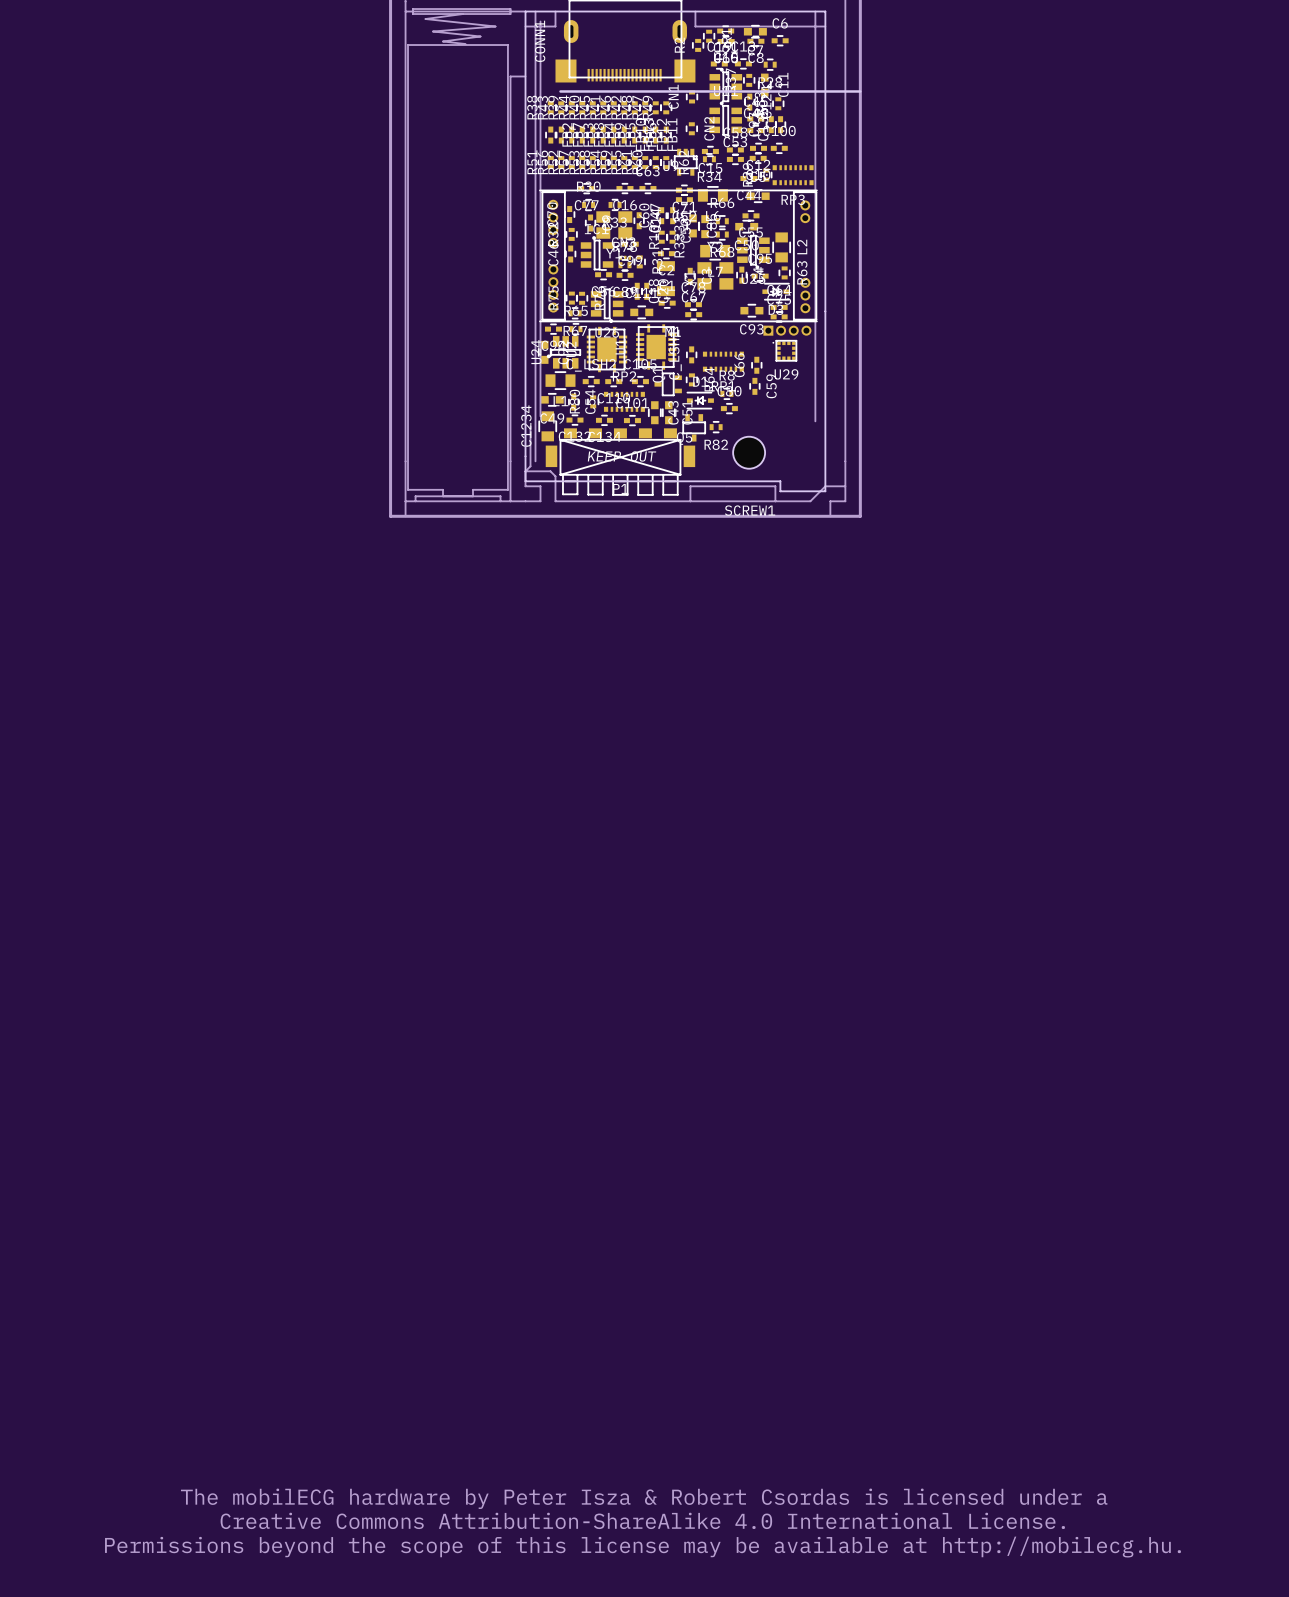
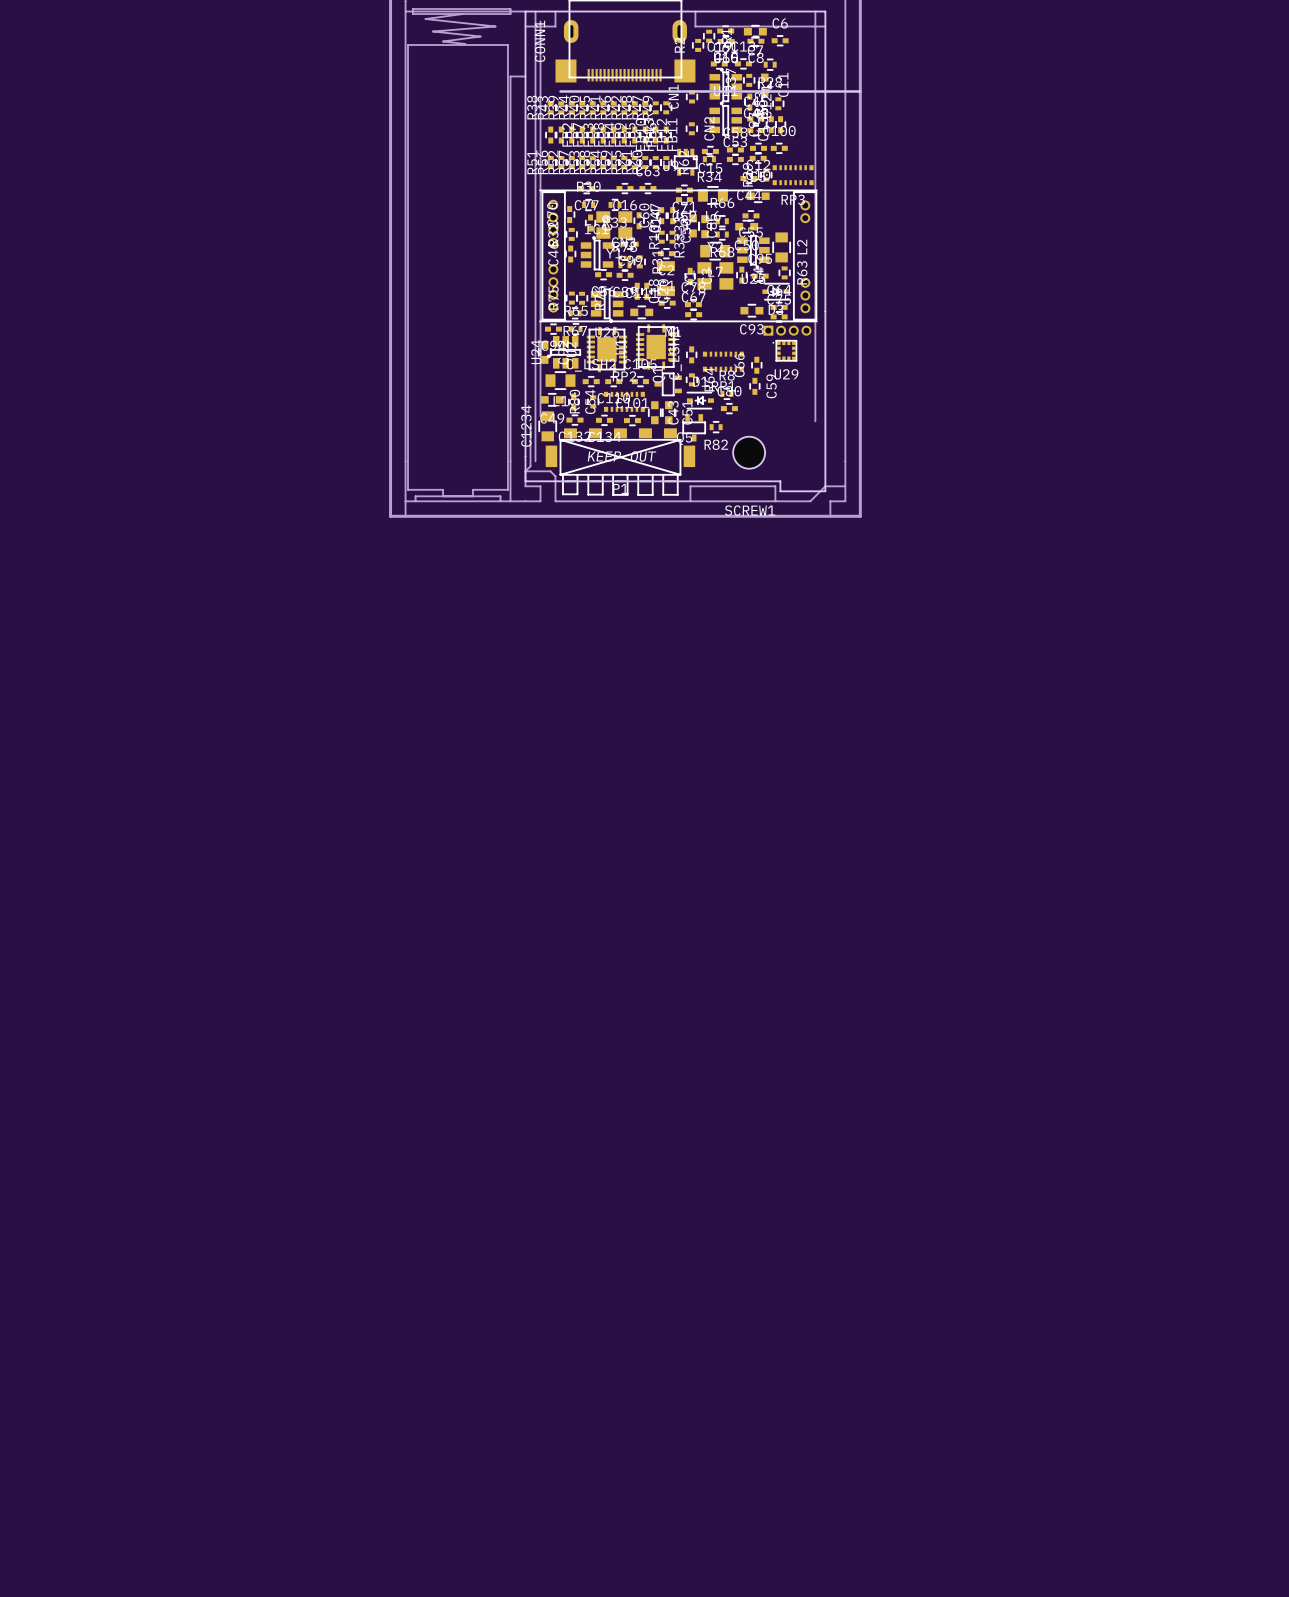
text: The mobilECG hardware by Peter Isza & Robert Csordas is licensed under a (644, 1498) -> none
text: Creative Commons Attribution-ShareAlike 4.0 International License. (642, 1520) -> none
text: Permissions beyond the scope of this license may be available at http://mobilecg.hu. (642, 1547) -> none

